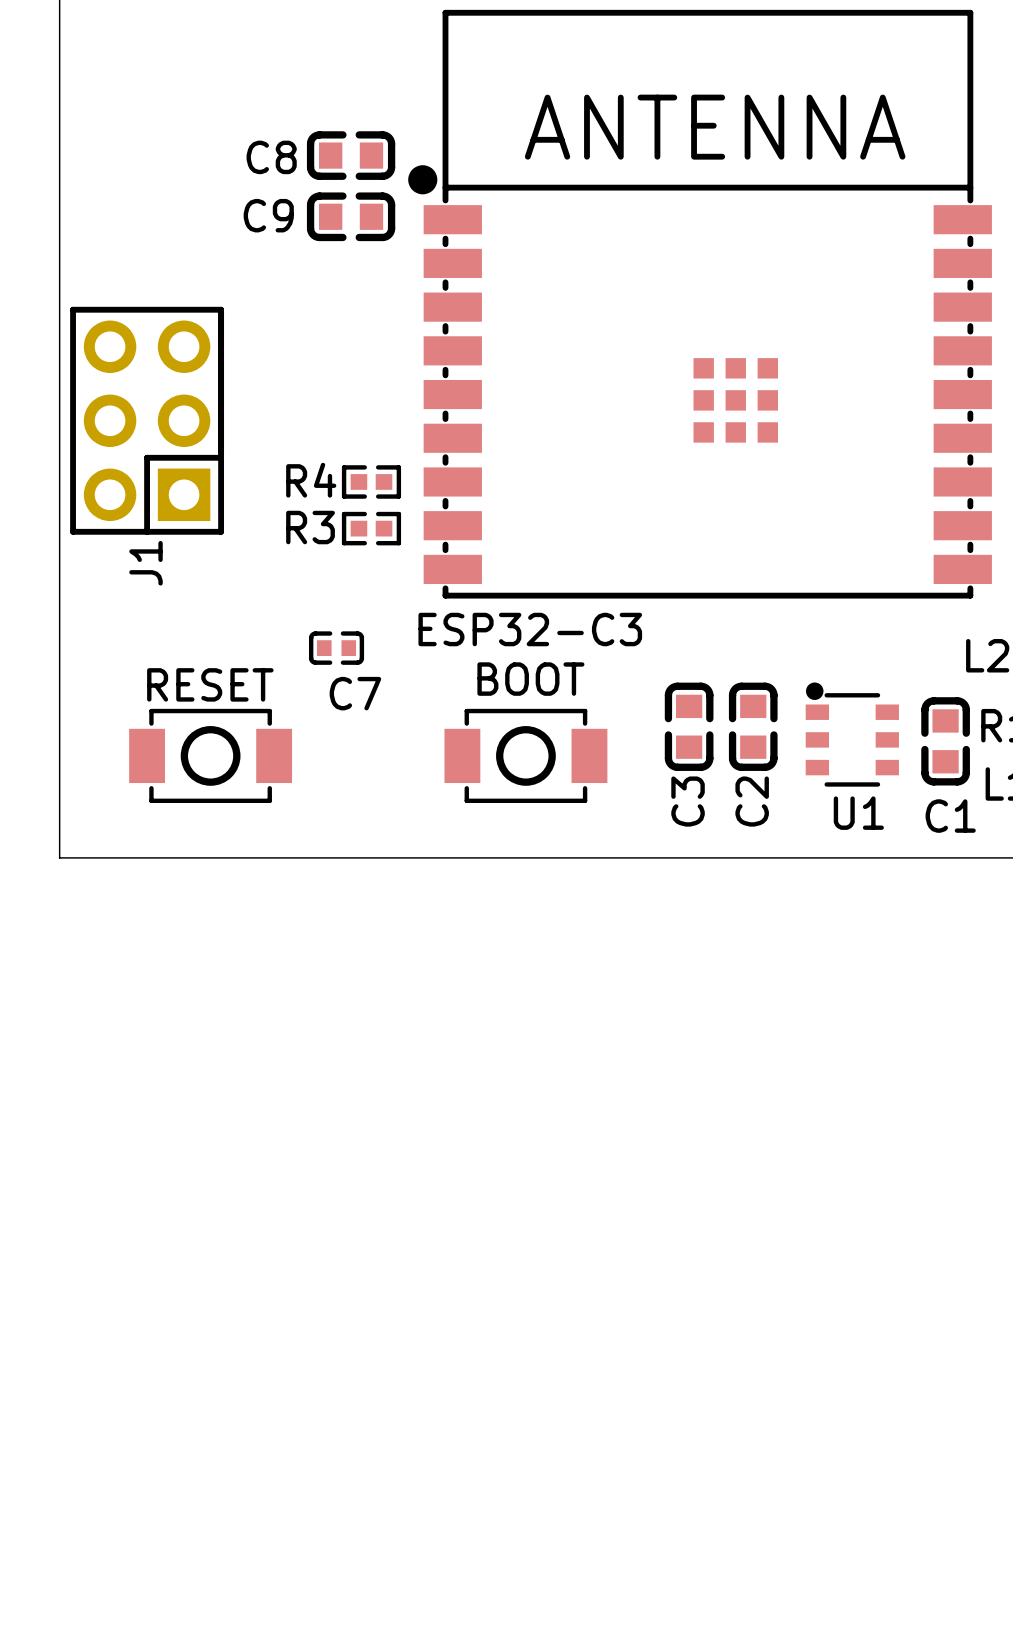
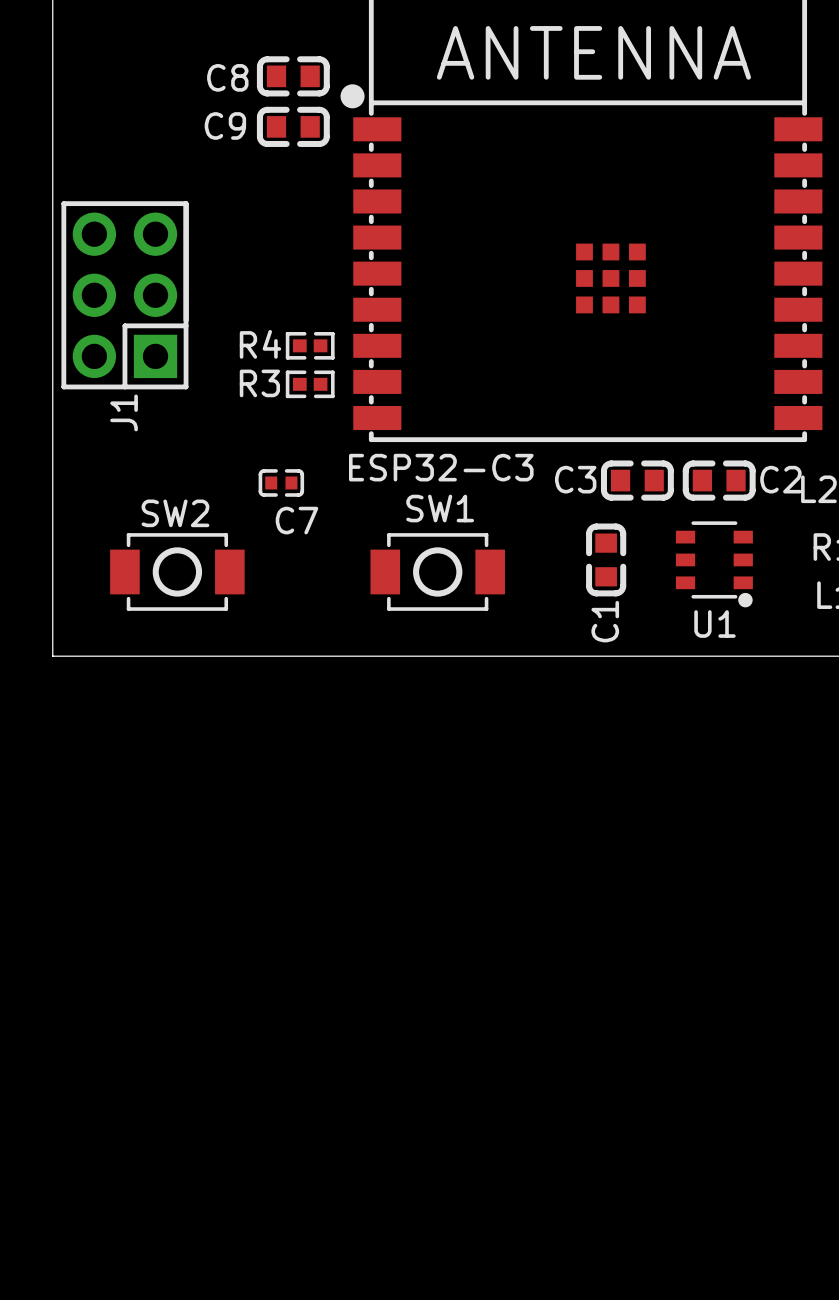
BOOT name: BOOT (530, 679) -> SW1 (440, 508)
RESET name: RESET (210, 684) -> SW2 (175, 513)
C3 rotation: 0° (689, 726) -> 90° clockwise (637, 480)
C3 position: (689, 726) -> (637, 480)
C2 rotation: 0° (753, 726) -> 90° clockwise (719, 480)
C2 position: (753, 726) -> (719, 480)
U1 rotation: 0° (852, 734) -> 180° (714, 564)
C1 position: (945, 741) -> (606, 559)
C2 name position: C2 (752, 801) -> C2 (780, 479)
C1 name rotation: 0° (950, 816) -> 90° counterclockwise (605, 621)

